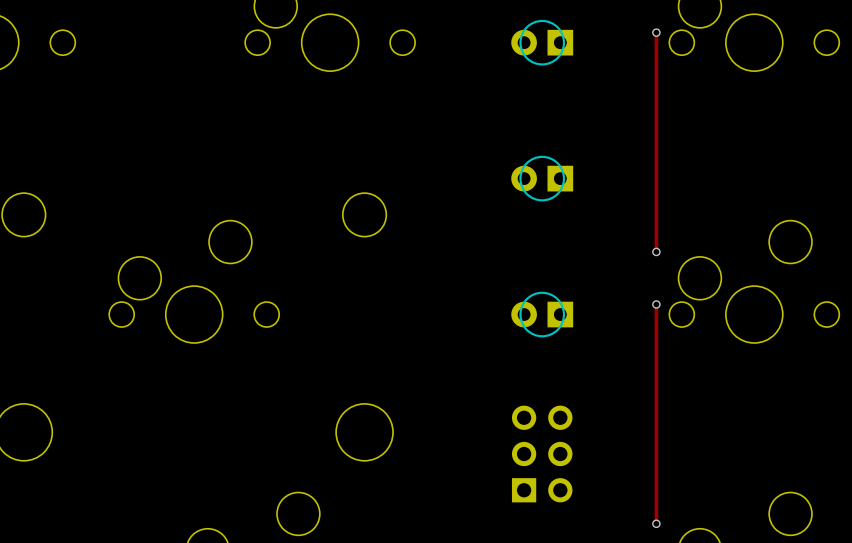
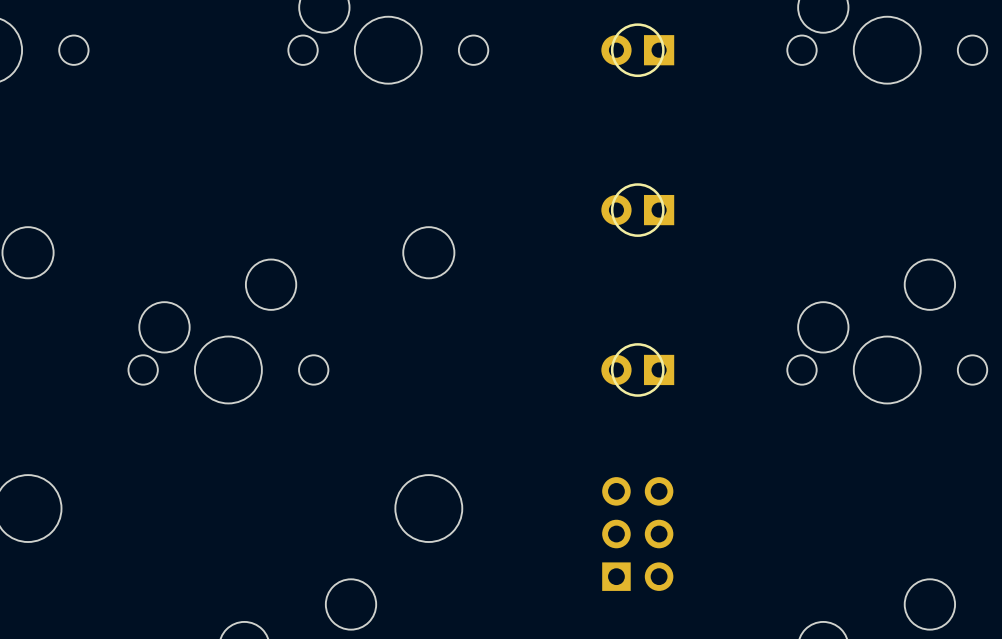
track: (656, 32) (656, 251) -> none
via: (656, 32) -> none
via: (656, 251) -> none
track: (656, 304) (656, 523) -> none
via: (656, 304) -> none
via: (656, 523) -> none

